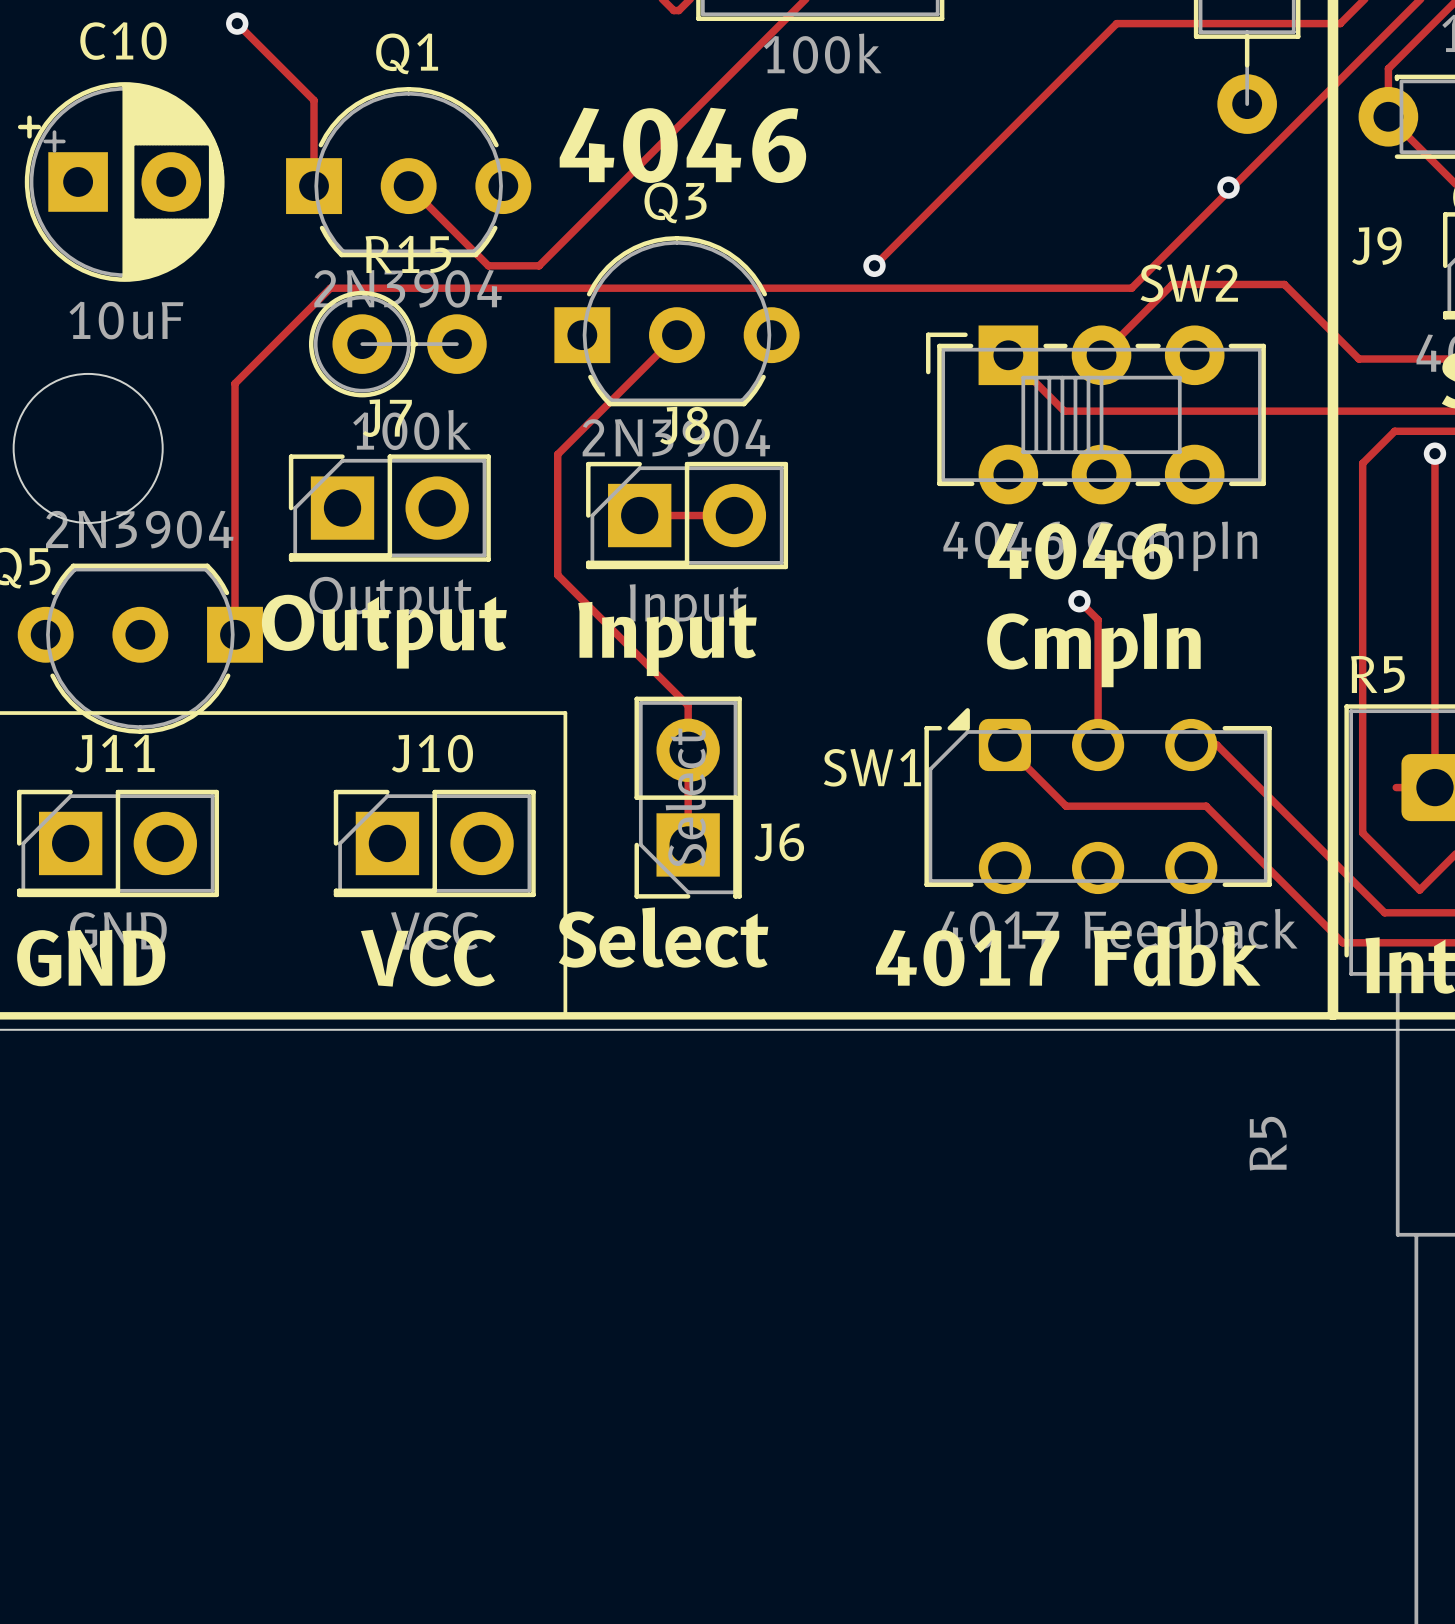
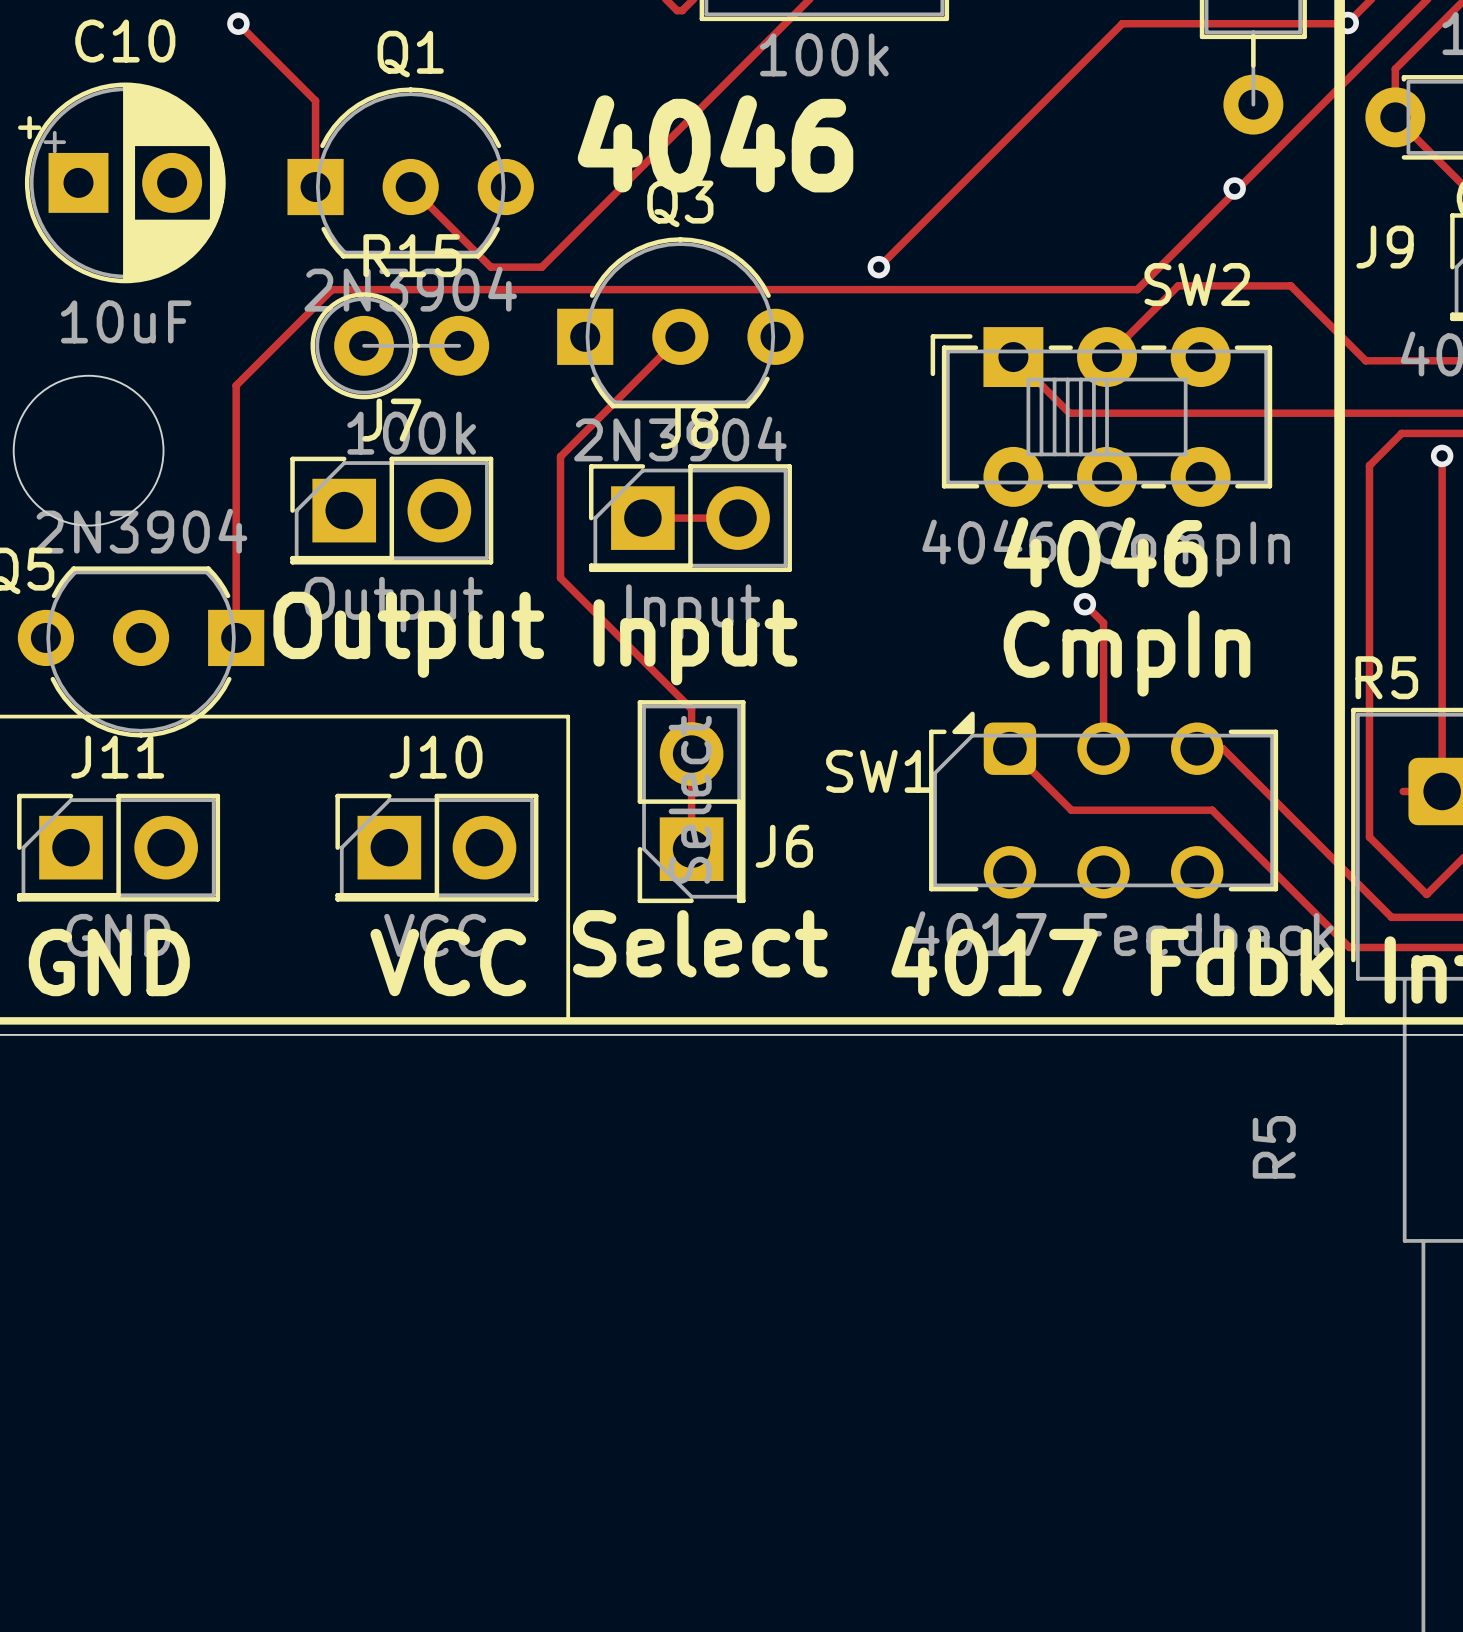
via: none -> (1347, 22)

